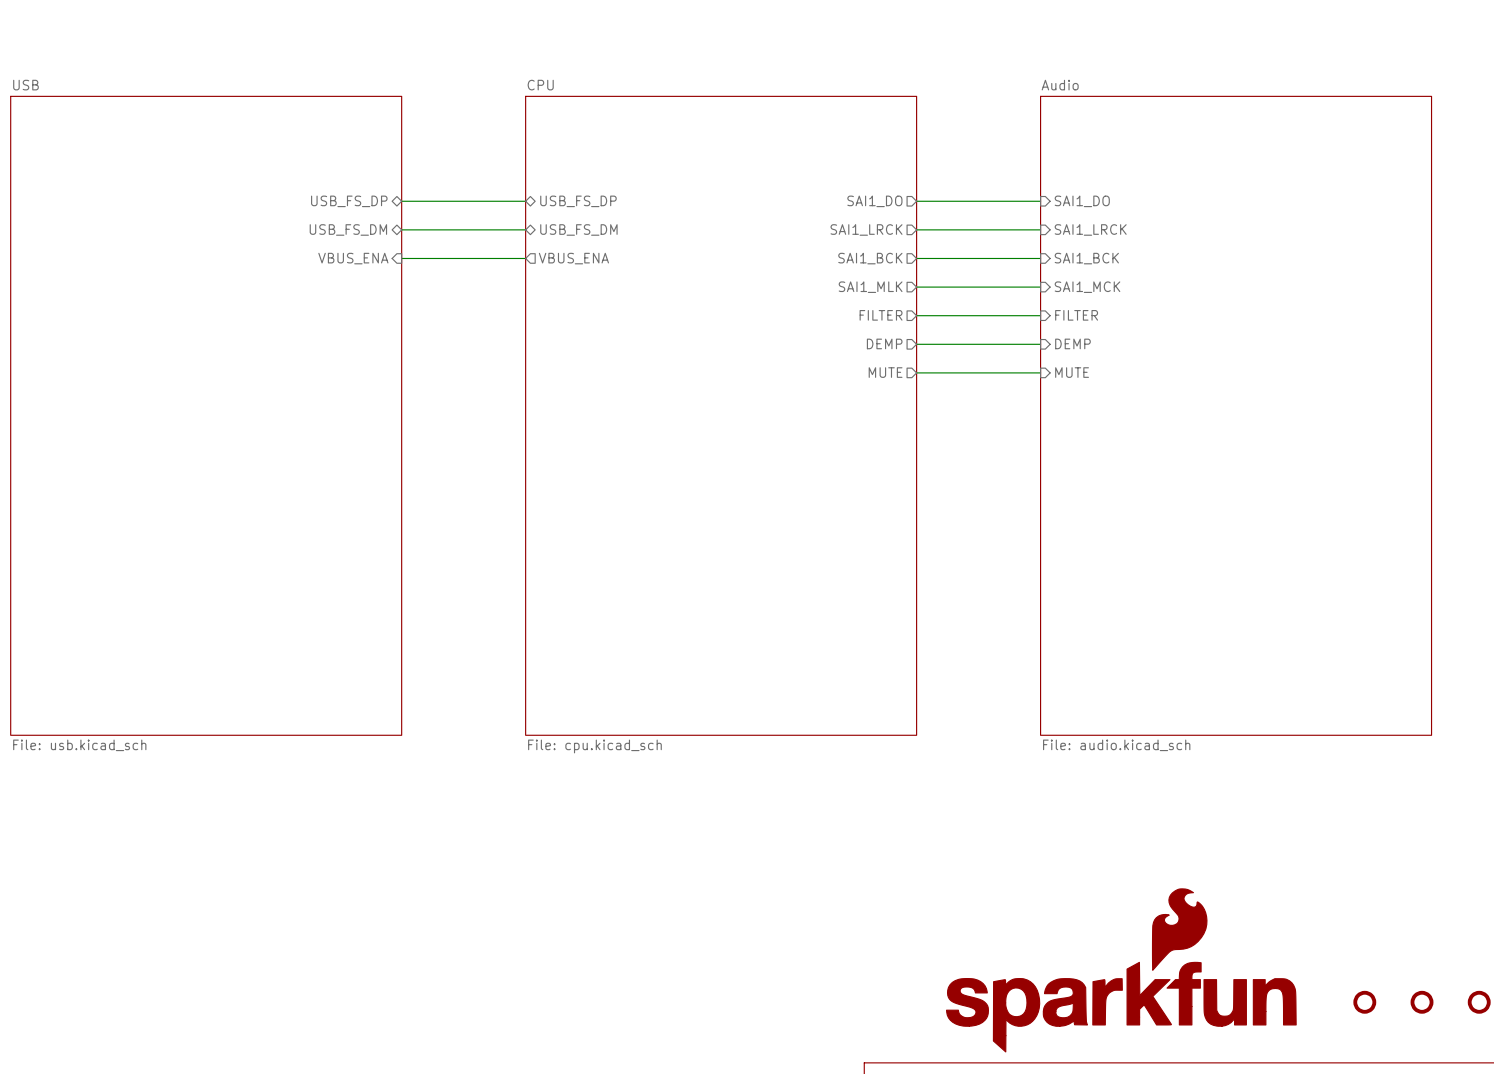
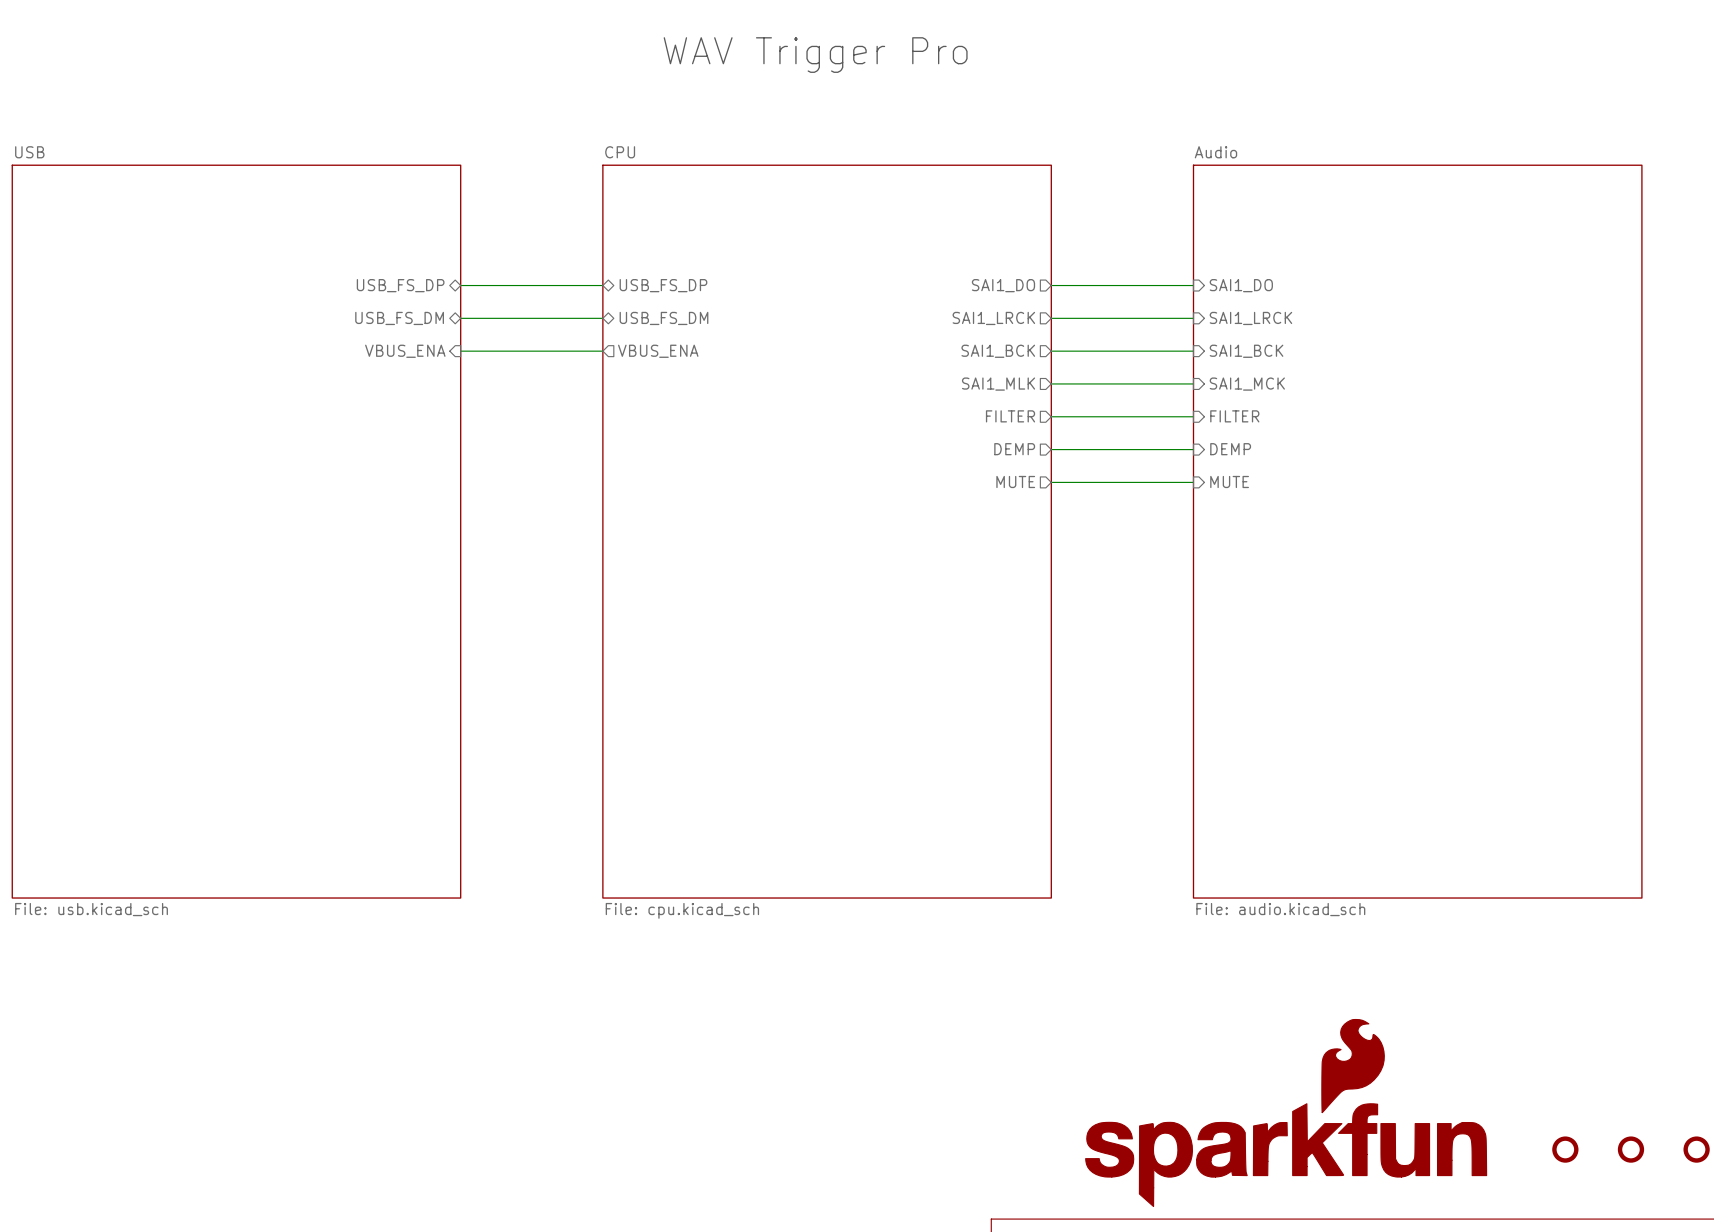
text: none -> WAV Trigger Pro (815, 55)
sheet pin position: USB_FS_DP (349, 201) -> USB_FS_DP (400, 285)
wire: (401, 201) (525, 201) -> (460, 285) (602, 285)
sheet pin position: USB_FS_DP (578, 201) -> USB_FS_DP (663, 285)
sheet pin position: SAI1_DO (874, 201) -> SAI1_DO (1003, 285)
wire: (916, 201) (1040, 201) -> (1051, 285) (1193, 285)
sheet pin position: SAI1_DO (1082, 201) -> SAI1_DO (1241, 285)
sheet pin position: USB_FS_DM (348, 229) -> USB_FS_DM (399, 318)
wire: (401, 229) (525, 229) -> (460, 318) (602, 318)
sheet pin position: USB_FS_DM (578, 229) -> USB_FS_DM (663, 318)
sheet pin position: SAI1_LRCK (866, 229) -> SAI1_LRCK (993, 318)
wire: (916, 229) (1040, 229) -> (1051, 318) (1193, 318)
sheet pin position: SAI1_LRCK (1090, 229) -> SAI1_LRCK (1250, 318)
sheet pin position: VBUS_ENA (353, 258) -> VBUS_ENA (405, 351)
wire: (401, 258) (525, 258) -> (460, 351) (602, 351)
sheet pin position: VBUS_ENA (573, 258) -> VBUS_ENA (658, 351)
sheet pin position: SAI1_BCK (870, 258) -> SAI1_BCK (998, 351)
wire: (916, 258) (1040, 258) -> (1051, 351) (1193, 351)
sheet pin position: SAI1_BCK (1086, 258) -> SAI1_BCK (1246, 351)
sheet pin position: SAI1_MLK (870, 287) -> SAI1_MLK (998, 384)
wire: (916, 287) (1040, 287) -> (1051, 383) (1193, 383)
sheet pin position: SAI1_MCK (1087, 287) -> SAI1_MCK (1247, 384)
sheet pin position: FILTER (881, 315) -> FILTER (1010, 416)
wire: (916, 315) (1040, 315) -> (1051, 416) (1193, 416)
sheet pin position: FILTER (1076, 315) -> FILTER (1234, 416)
sheet pin position: DEMP (884, 343) -> DEMP (1014, 449)
sheet pin position: DEMP (1072, 343) -> DEMP (1230, 449)
wire: (916, 344) (1040, 344) -> (1051, 449) (1193, 449)
sheet pin position: MUTE (885, 372) -> MUTE (1015, 481)
wire: (916, 372) (1040, 372) -> (1051, 482) (1193, 482)
sheet pin position: MUTE (1072, 372) -> MUTE (1229, 481)
sheet USB position: (206, 415) -> (236, 531)
sheet CPU position: (721, 415) -> (827, 531)
sheet Audio position: (1236, 415) -> (1417, 531)

